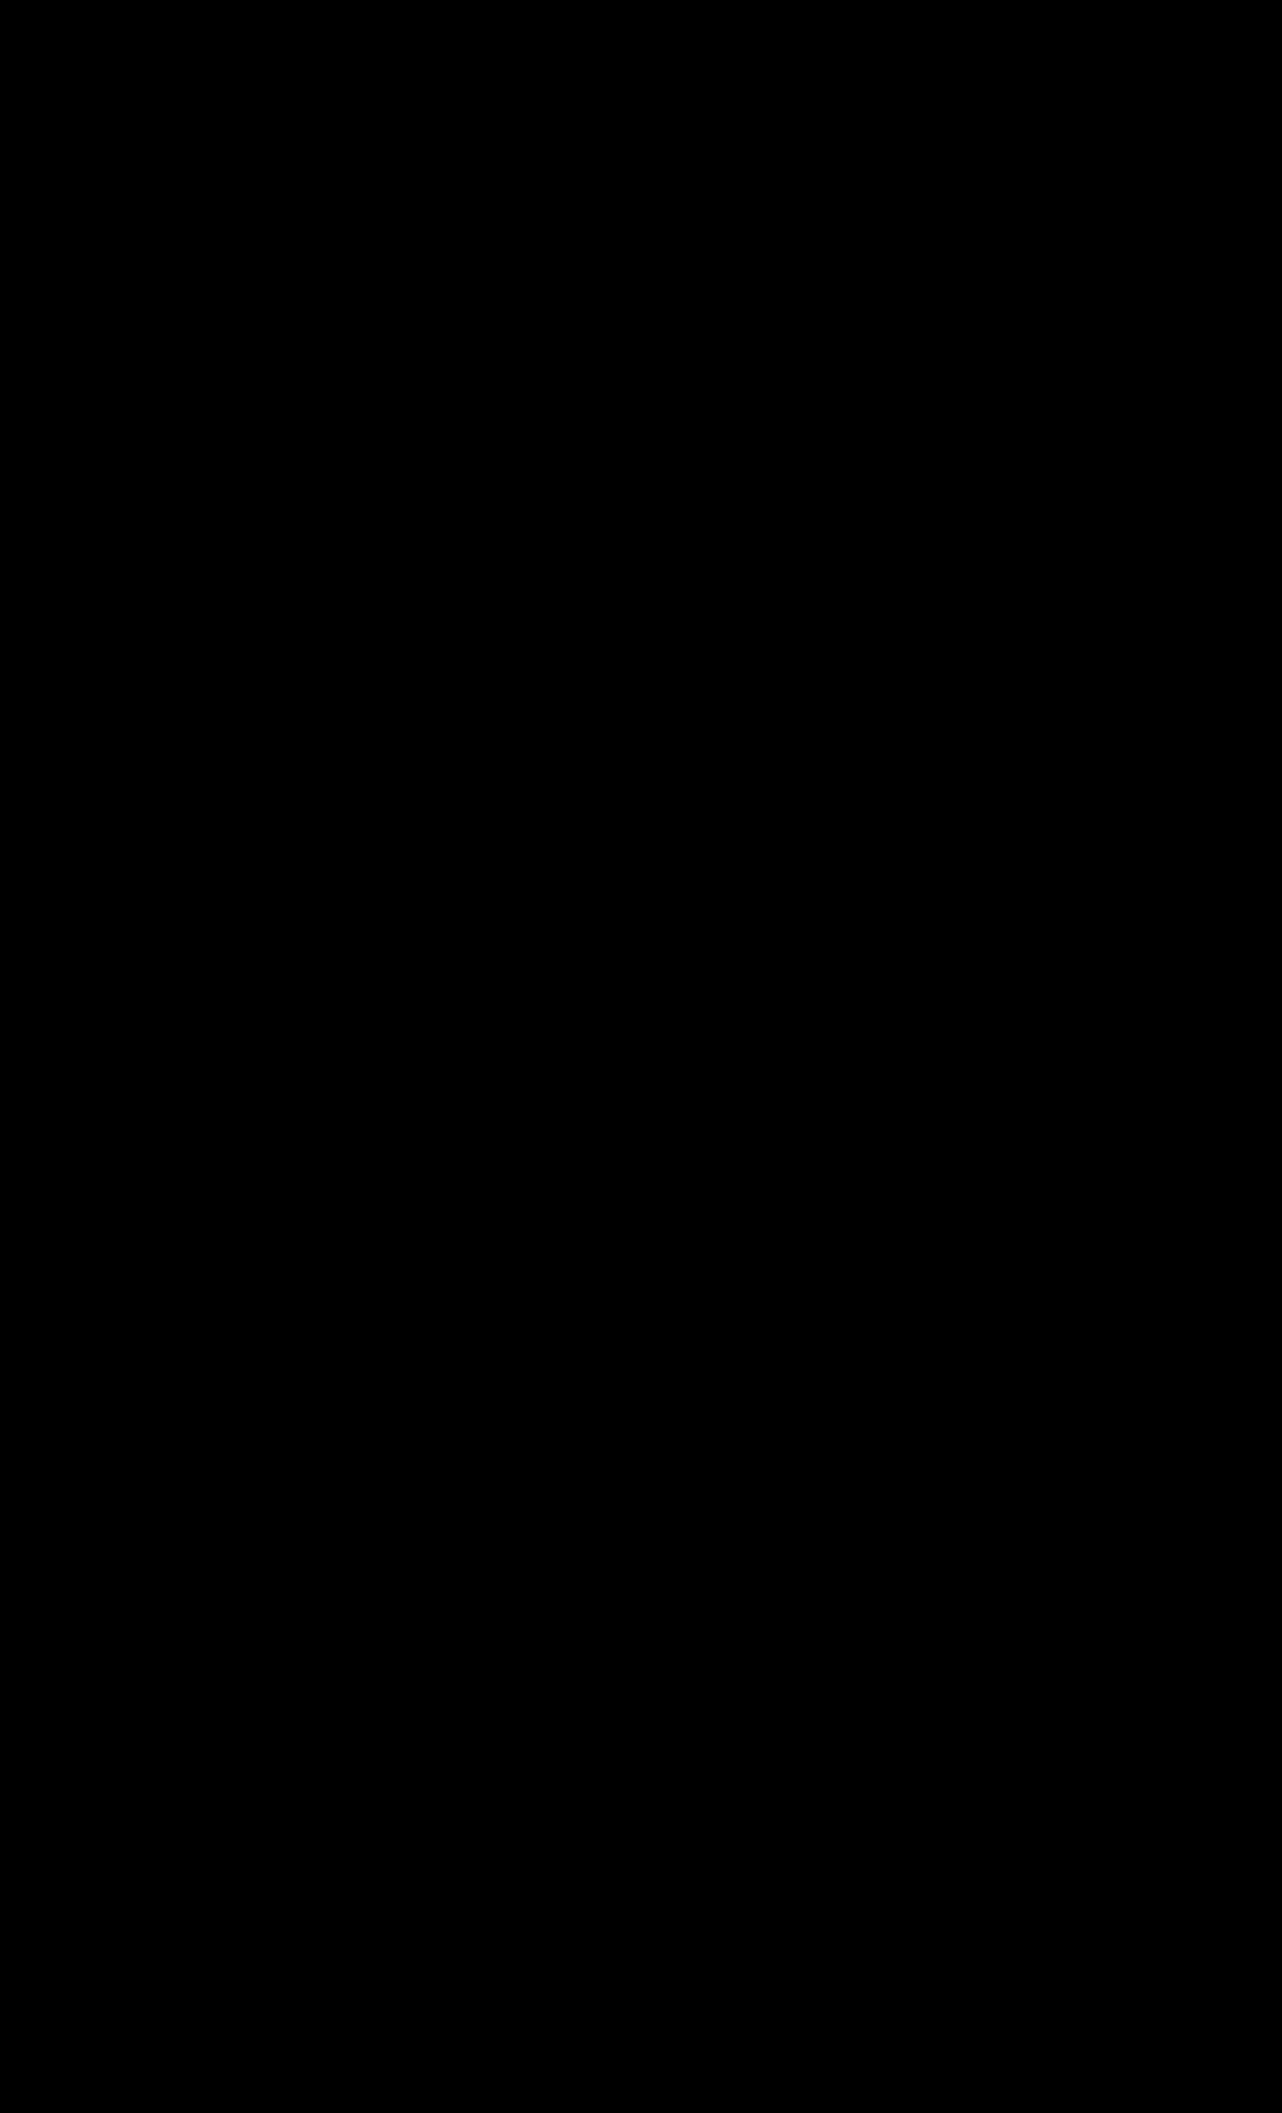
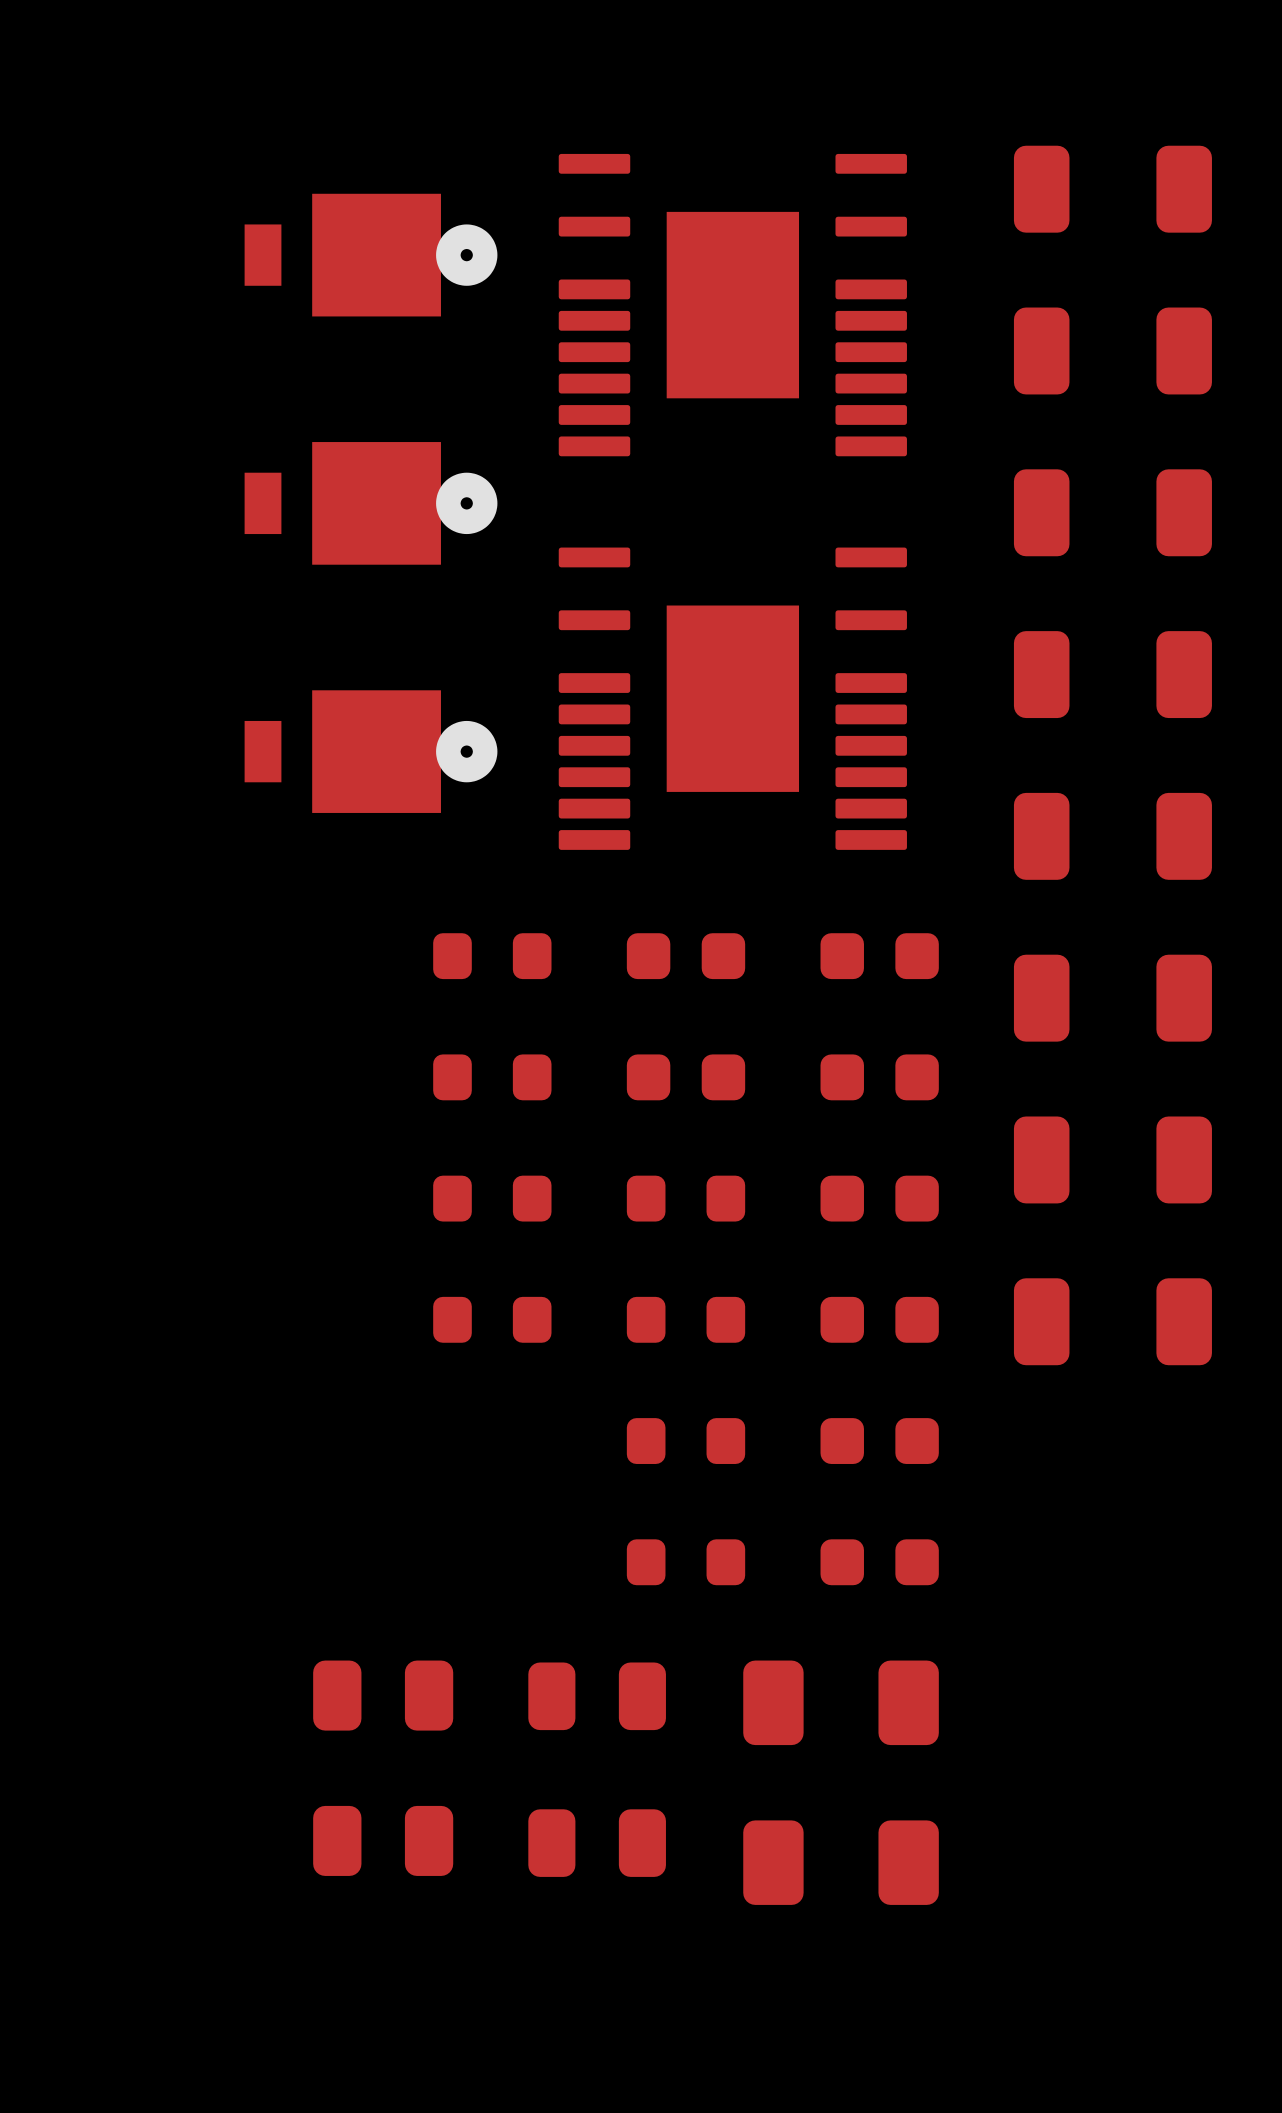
part: none -> (1112, 189)
part: none -> (371, 255)
part: none -> (732, 305)
part: none -> (1112, 350)
part: none -> (371, 503)
part: none -> (1112, 512)
part: none -> (1112, 674)
part: none -> (732, 698)
part: none -> (371, 751)
part: none -> (1112, 836)
part: none -> (492, 956)
part: none -> (686, 956)
part: none -> (879, 956)
part: none -> (1112, 998)
part: none -> (492, 1077)
part: none -> (686, 1077)
part: none -> (879, 1077)
part: none -> (1112, 1159)
part: none -> (492, 1198)
part: none -> (686, 1198)
part: none -> (879, 1198)
part: none -> (492, 1319)
part: none -> (686, 1319)
part: none -> (879, 1319)
part: none -> (1112, 1321)
part: none -> (686, 1441)
part: none -> (879, 1441)
part: none -> (686, 1562)
part: none -> (879, 1562)
part: none -> (383, 1695)
part: none -> (597, 1696)
part: none -> (841, 1702)
part: none -> (383, 1840)
part: none -> (597, 1843)
part: none -> (841, 1862)

